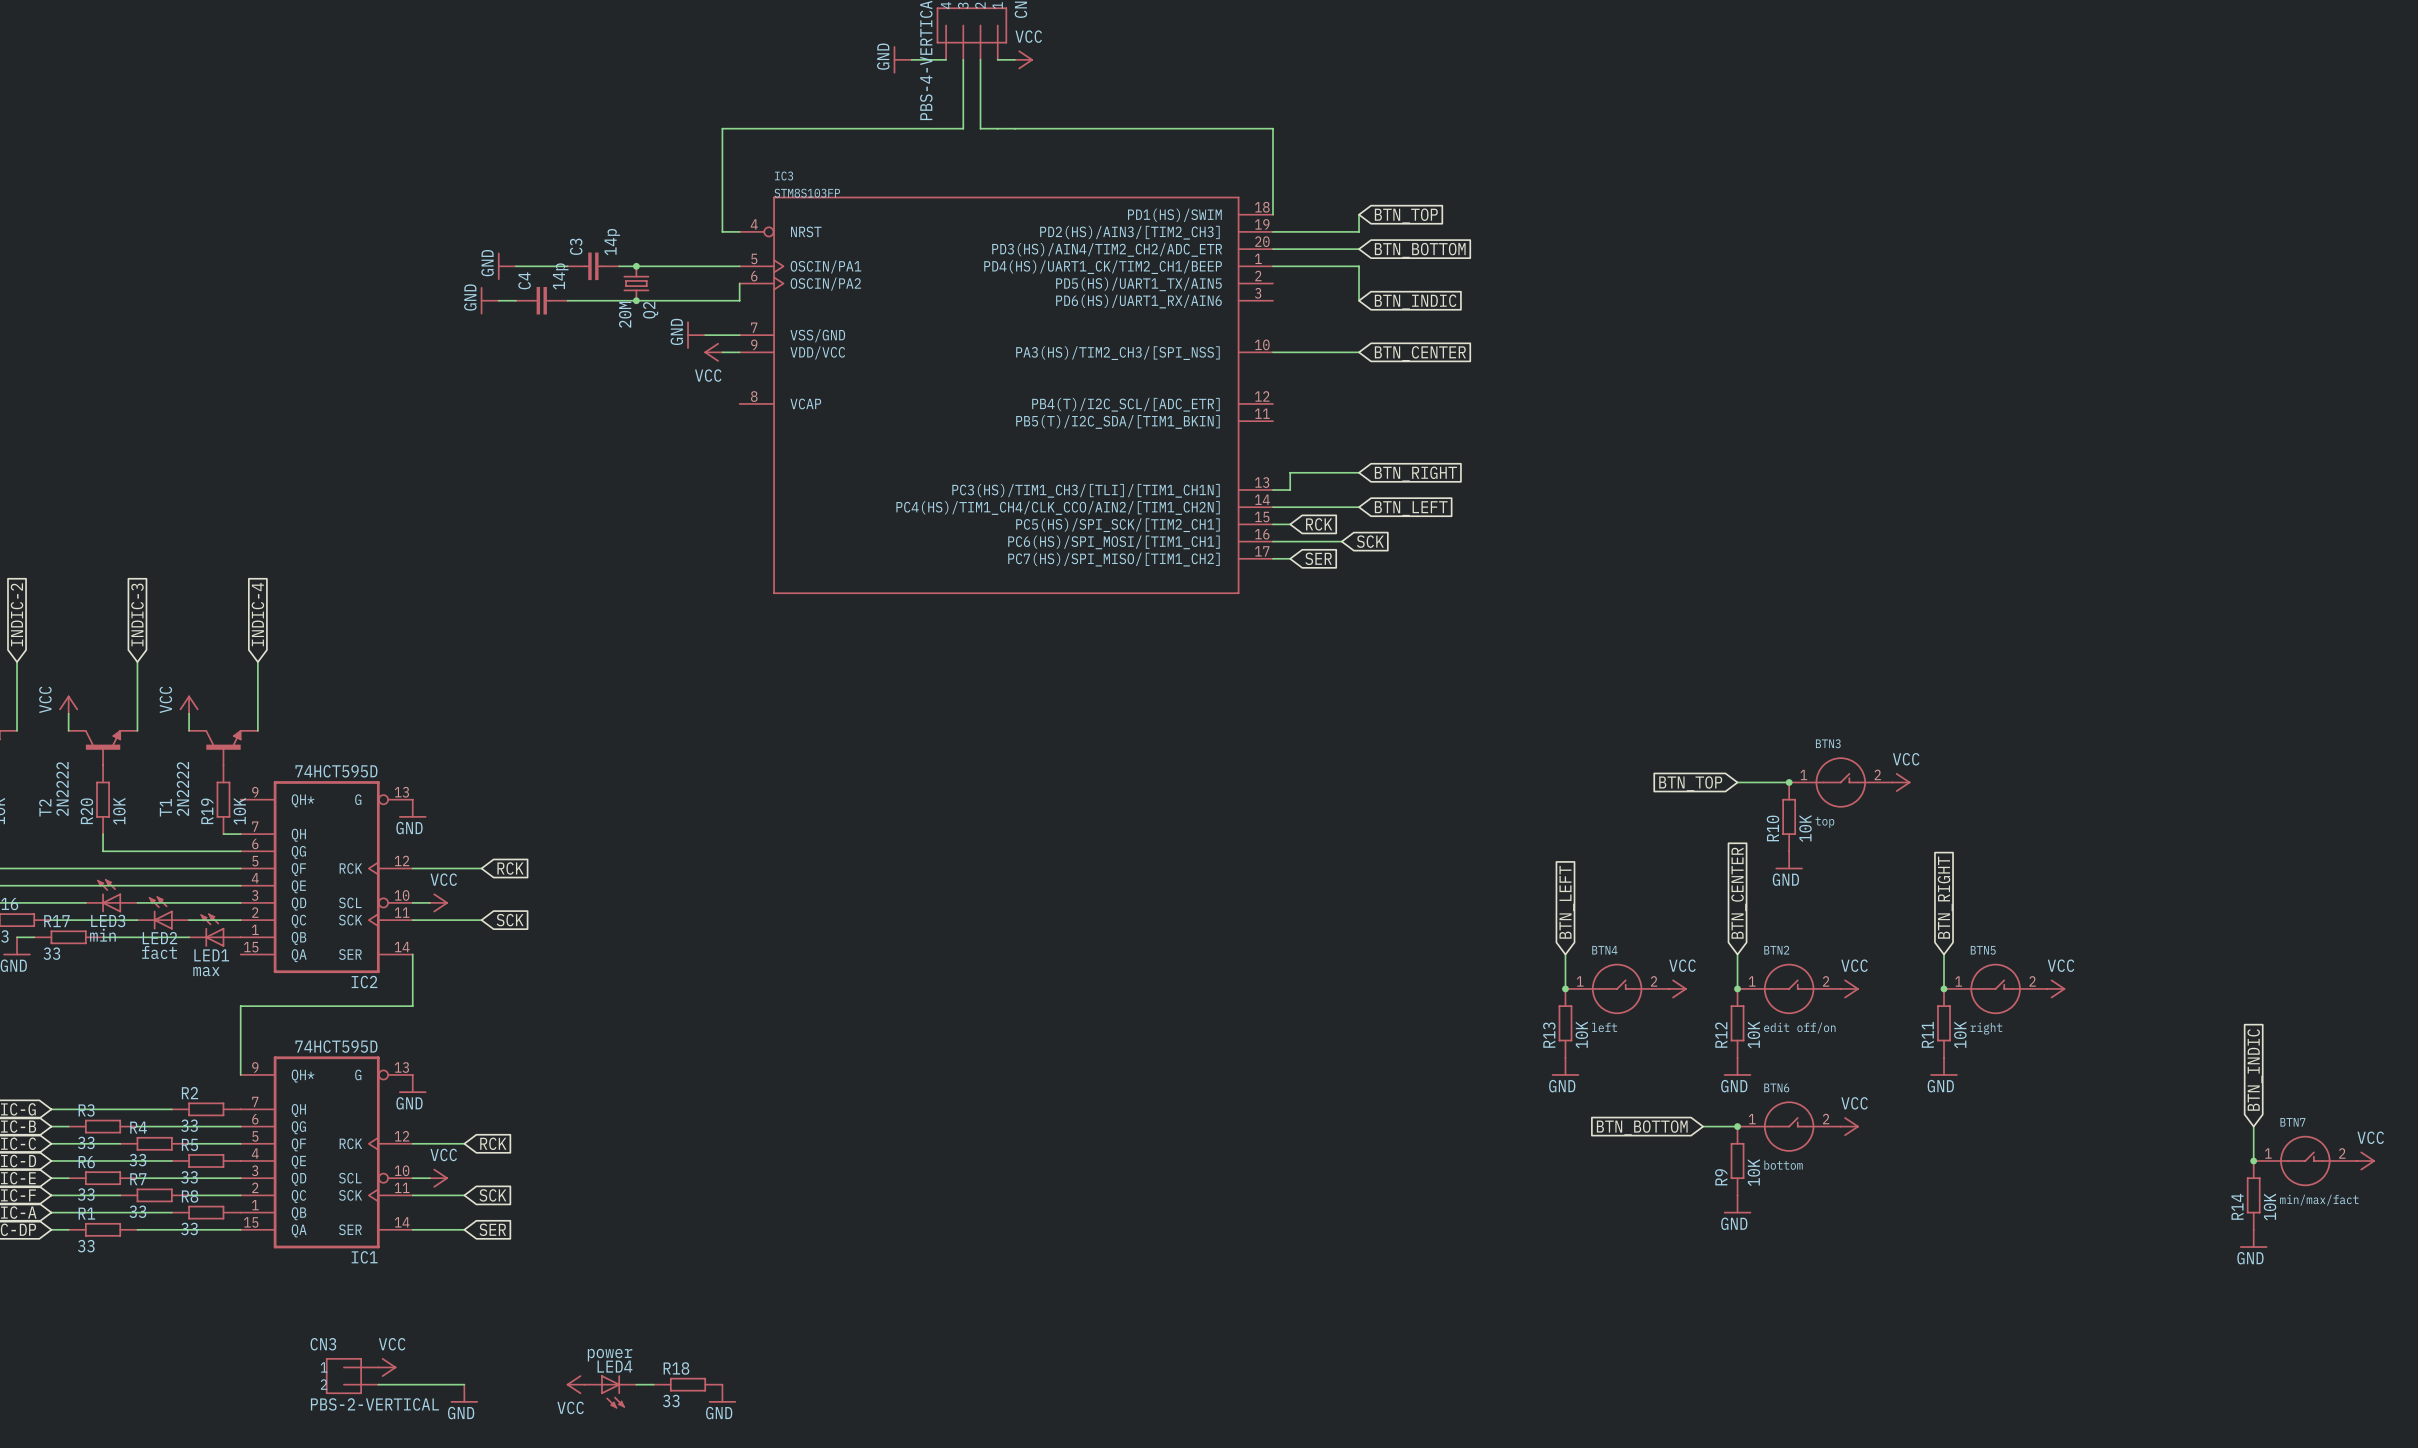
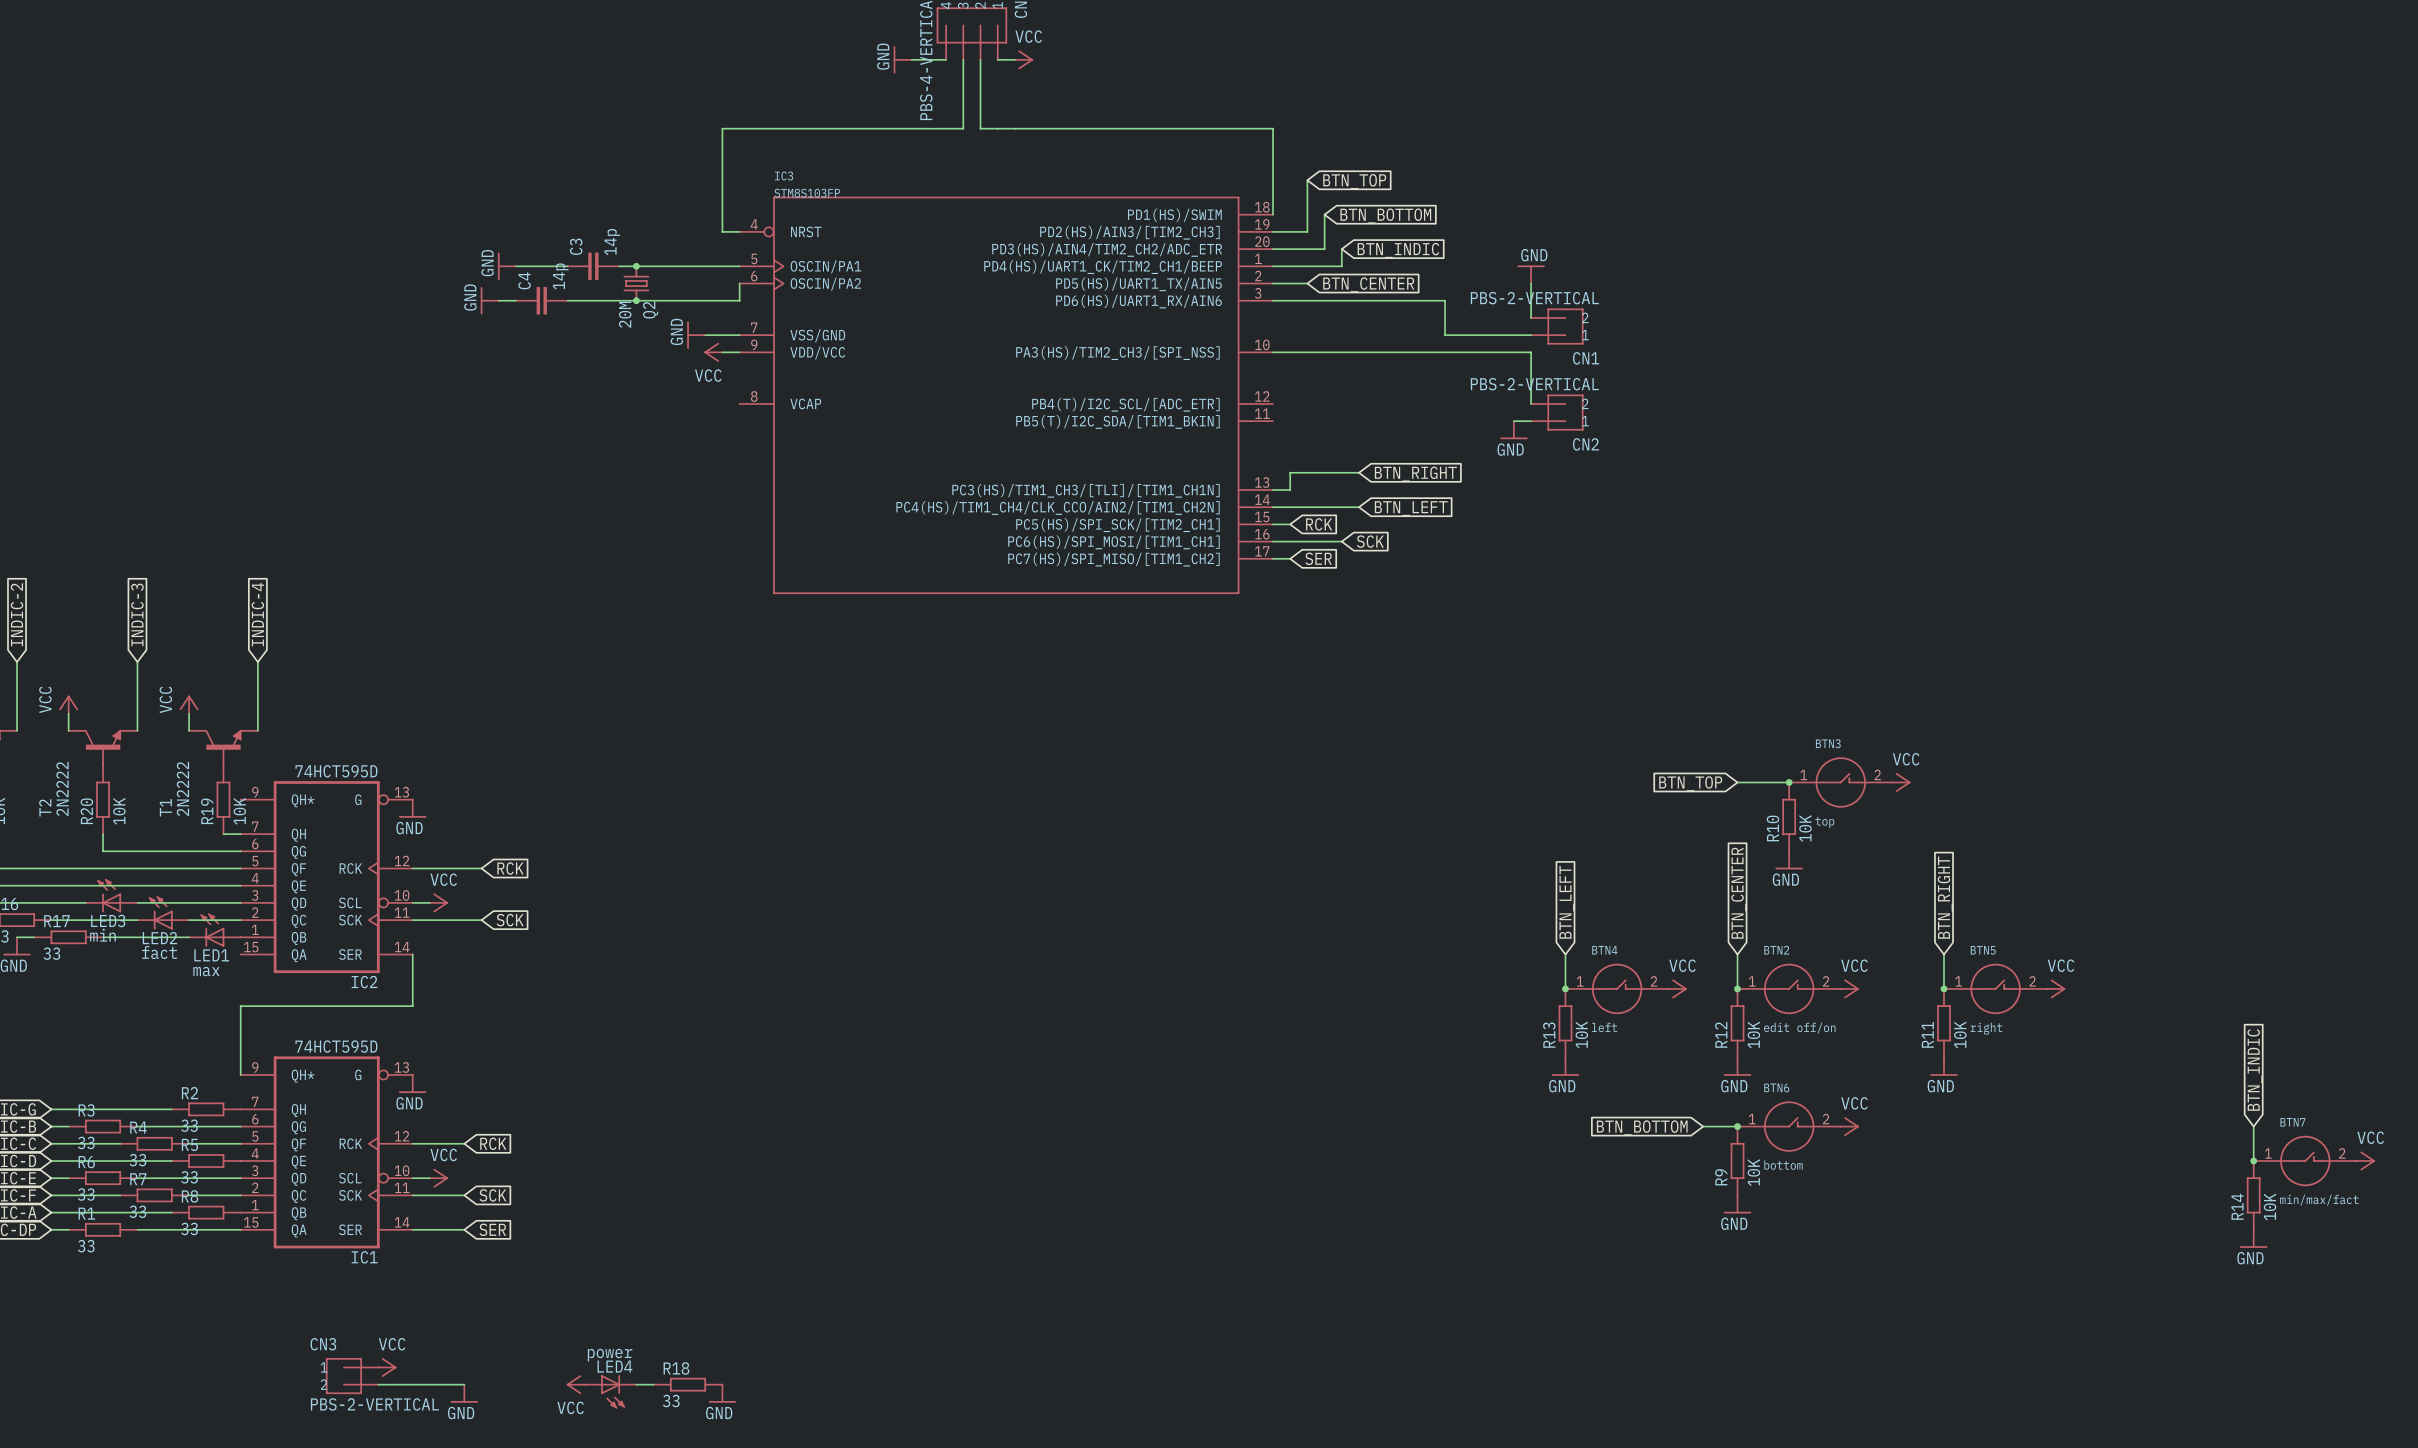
wire: (1359, 214) (1359, 231) (1307, 231) -> (1307, 180) (1307, 231)
global label position: BTN_TOP (1406, 216) -> BTN_TOP (1354, 181)
wire: (1324, 249) (1359, 249) -> (1324, 249) (1324, 214)
global label position: BTN_BOTTOM (1420, 250) -> BTN_BOTTOM (1385, 216)
wire: (1341, 266) (1359, 266) (1359, 300) -> (1341, 266) (1341, 249)
power symbol: none -> GND (1531, 274)
wire: none -> (1272, 283) (1307, 283)
wire: none -> (1531, 283) (1531, 317)
wire: none -> (1272, 300) (1445, 300) (1445, 335) (1531, 335)
global label position: BTN_INDIC (1415, 302) -> BTN_INDIC (1398, 250)
CN1: none -> PBS-2-VERTICAL (1557, 326)
wire: none -> (1359, 352) (1531, 352) (1531, 403)
global label position: BTN_CENTER (1420, 353) -> BTN_CENTER (1368, 284)
CN2: none -> PBS-2-VERTICAL (1557, 412)
wire: none -> (1513, 421) (1531, 421)
power symbol: none -> GND (1513, 430)

